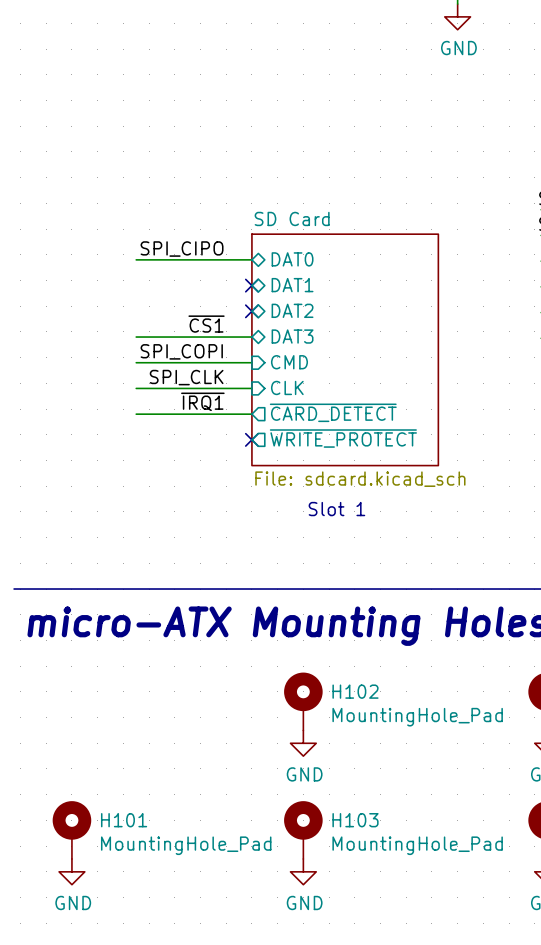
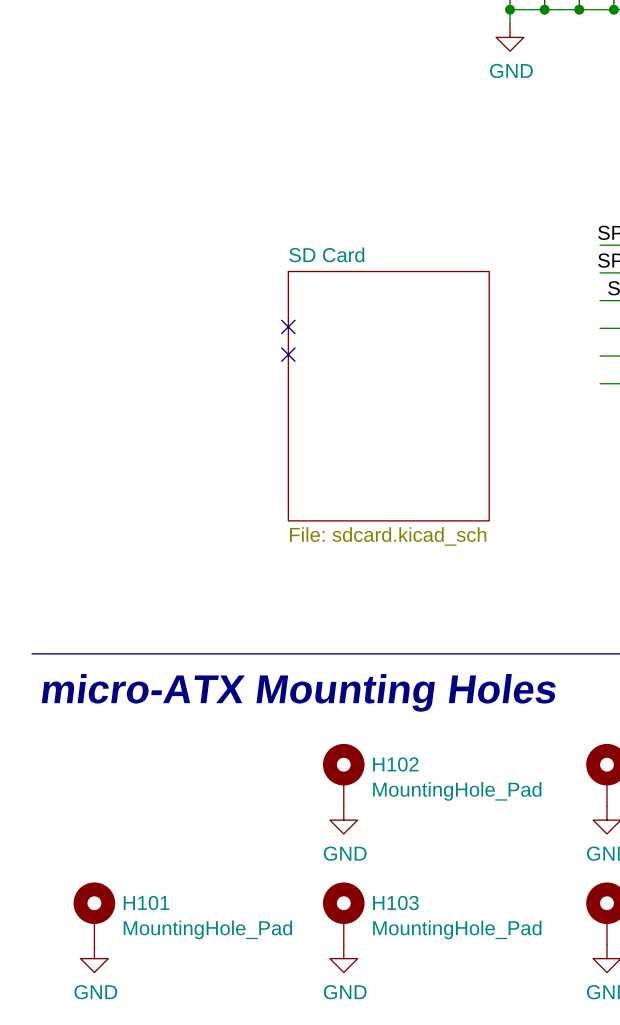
label: SPI_CIPO (182, 249) -> none
wire: (136, 259) (251, 259) -> none
sheet pin: DAT0 (292, 259) -> none
sheet pin: DAT1 (292, 285) -> none
sheet pin: DAT2 (292, 310) -> none
label: ~{CS1} (206, 324) -> none
sheet pin: DAT3 (292, 336) -> none
wire: (136, 337) (251, 337) -> none
label: SPI_COPI (181, 351) -> none
wire: (136, 362) (251, 362) -> none
sheet pin: CMD (289, 362) -> none
label: SPI_CLK (186, 377) -> none
sheet pin: CLK (287, 387) -> none
wire: (136, 388) (251, 388) -> none
label: ~{IRQ1} (202, 401) -> none
sheet pin: ~{CARD_DETECT} (333, 412) -> none
wire: (136, 414) (251, 414) -> none
sheet pin: ~{WRITE_PROTECT} (343, 438) -> none
no-connect mark: (251, 439) -> none
text: Slot 1 (336, 509) -> none

